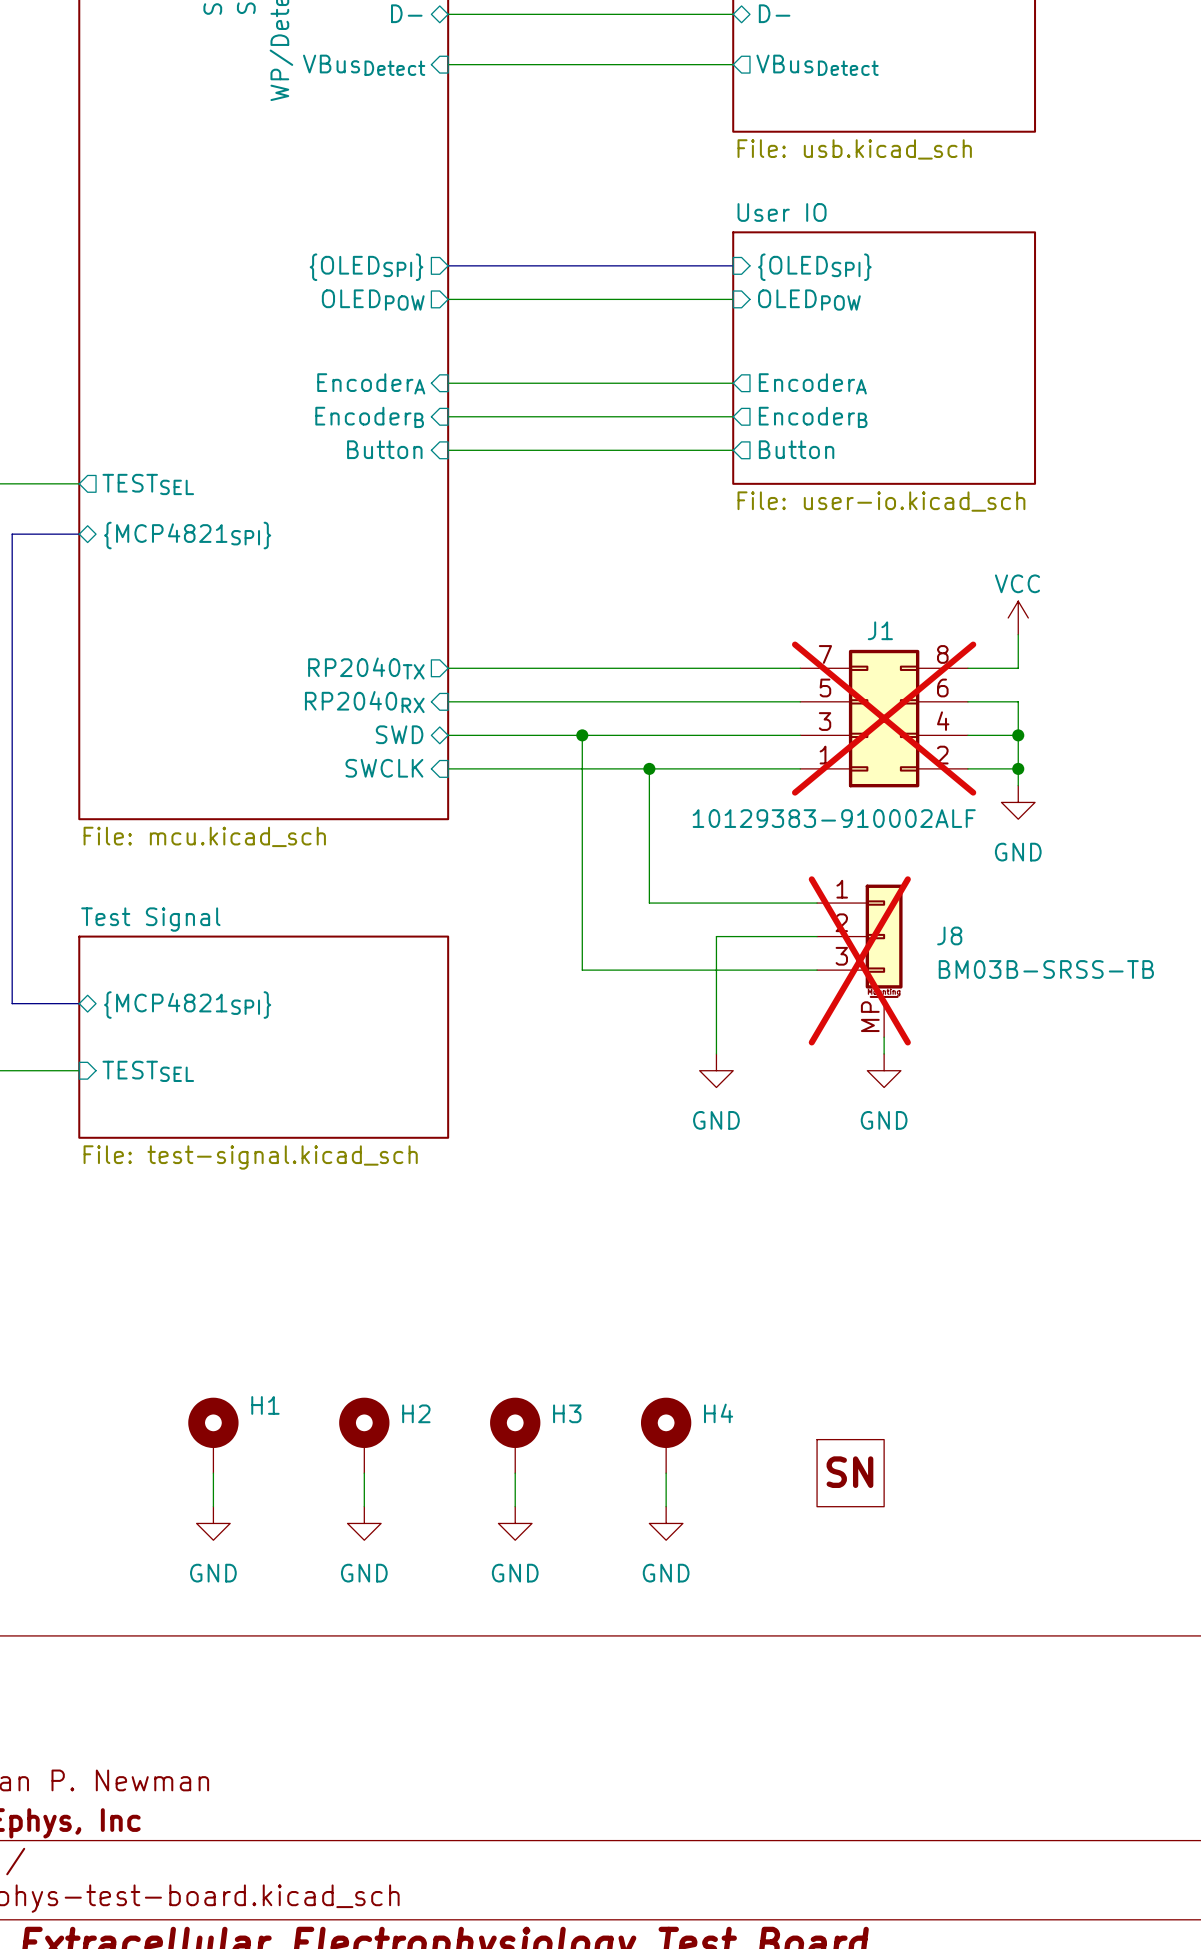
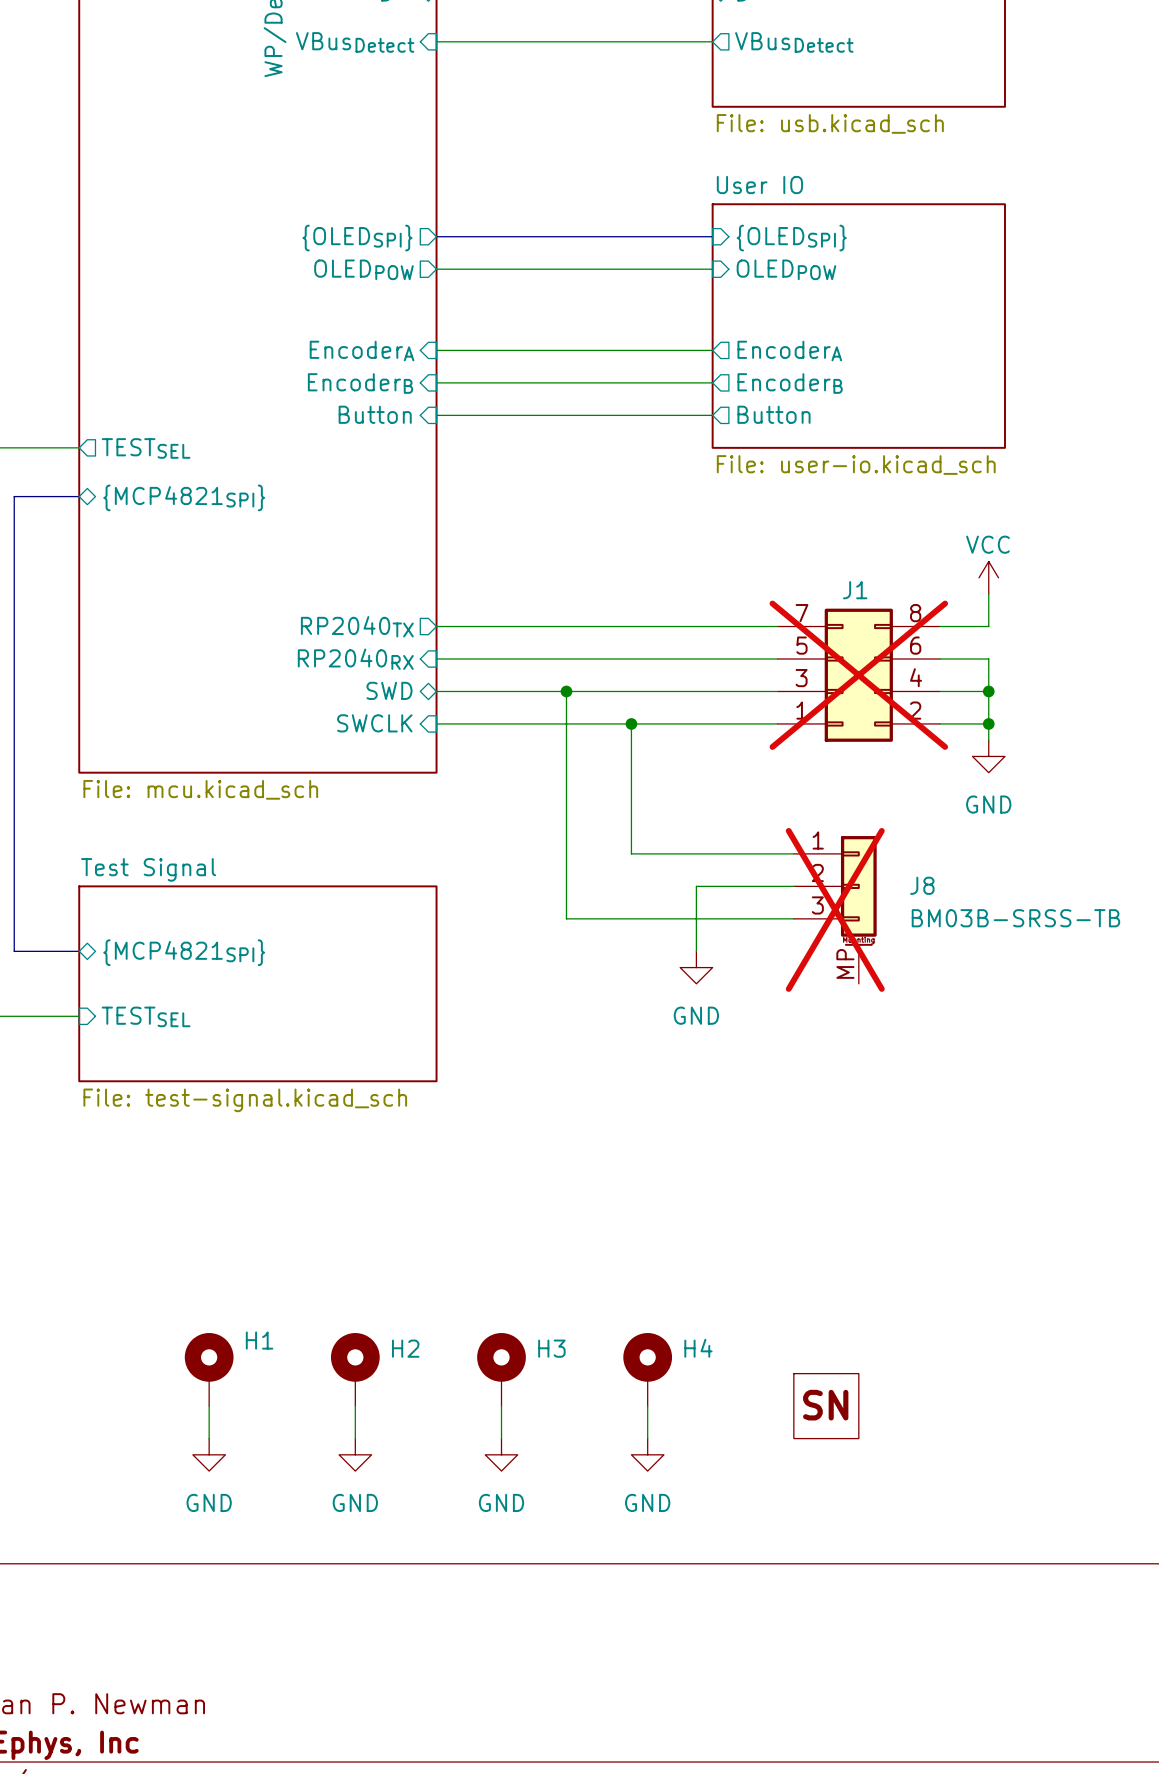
J1 value: 10129383-910002ALF (834, 818) -> none
wire: (716, 1003) (716, 1053) -> none
wire: (884, 1037) (884, 1053) -> none
power symbol position: GND (716, 1070) -> GND (696, 967)
power symbol: GND (884, 1070) -> none

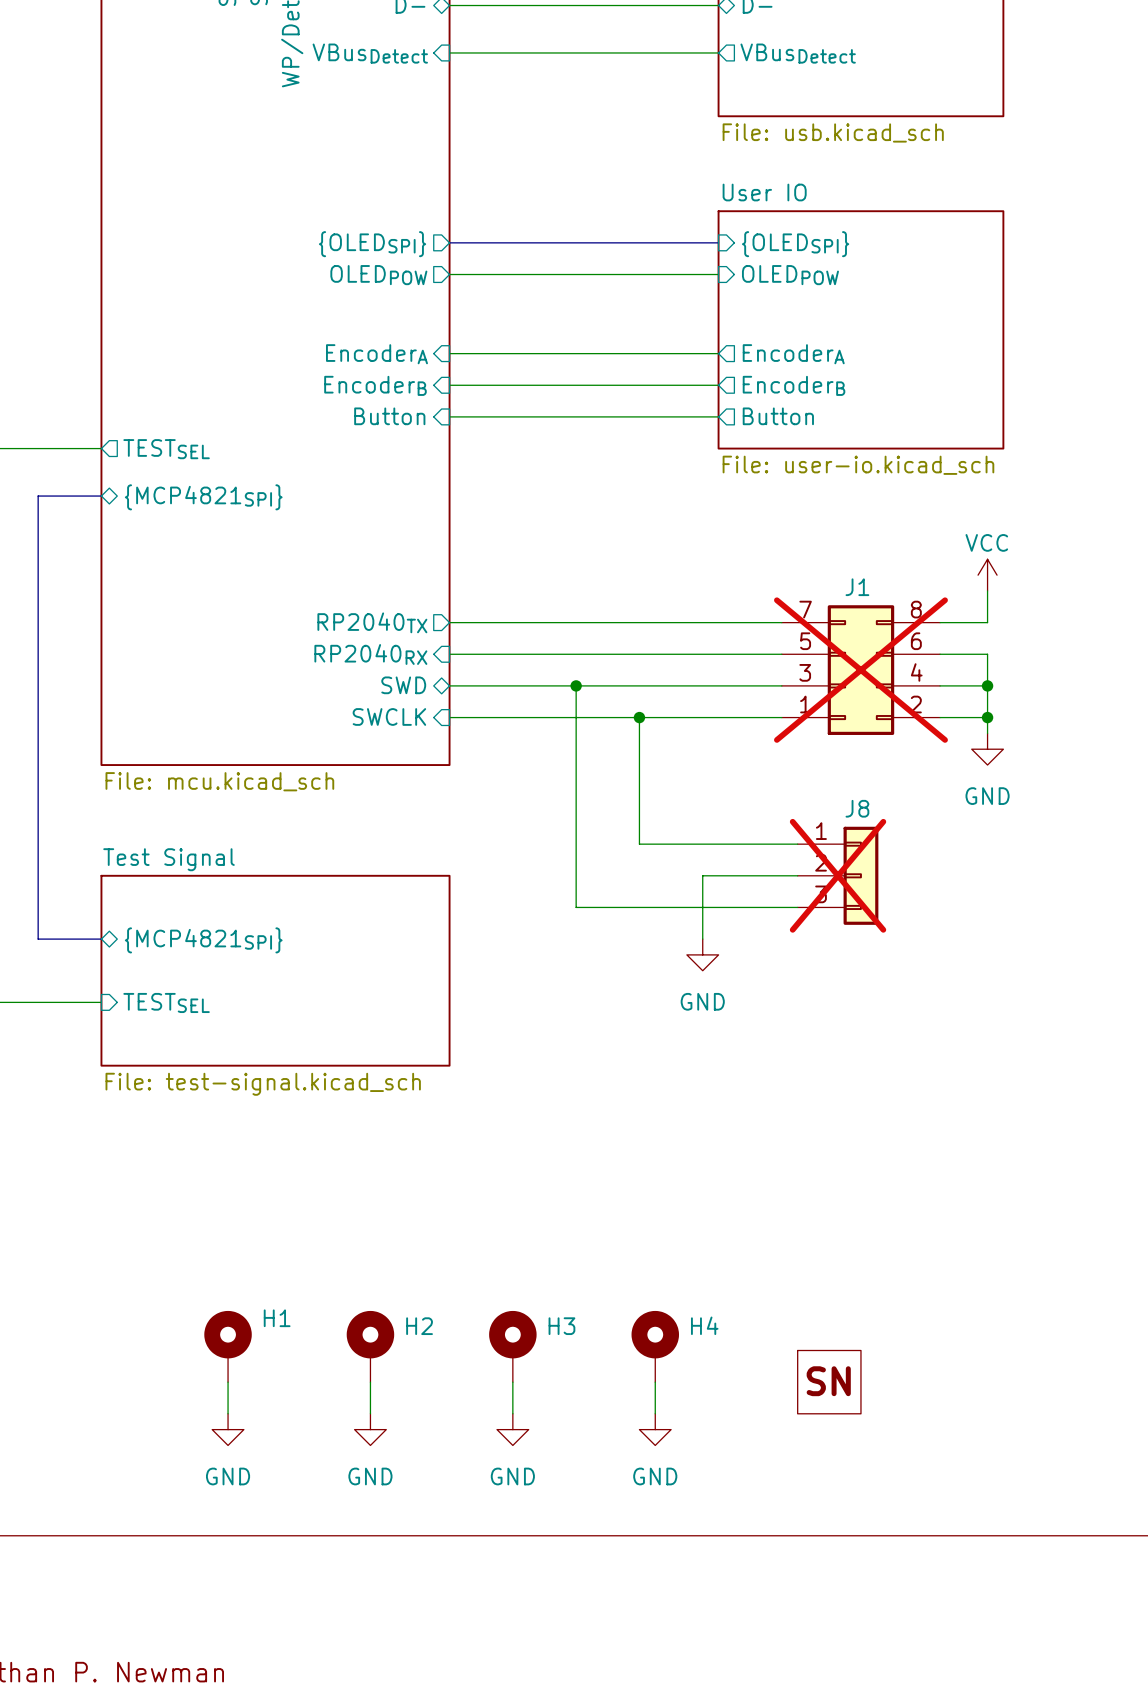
J8 symbol: [793, 836, 877, 984] -> [797, 826, 879, 925]
J8 name position: J8 (922, 885) -> J8 (857, 808)
J8 value: BM03B-SRSS-TB (1015, 918) -> none

